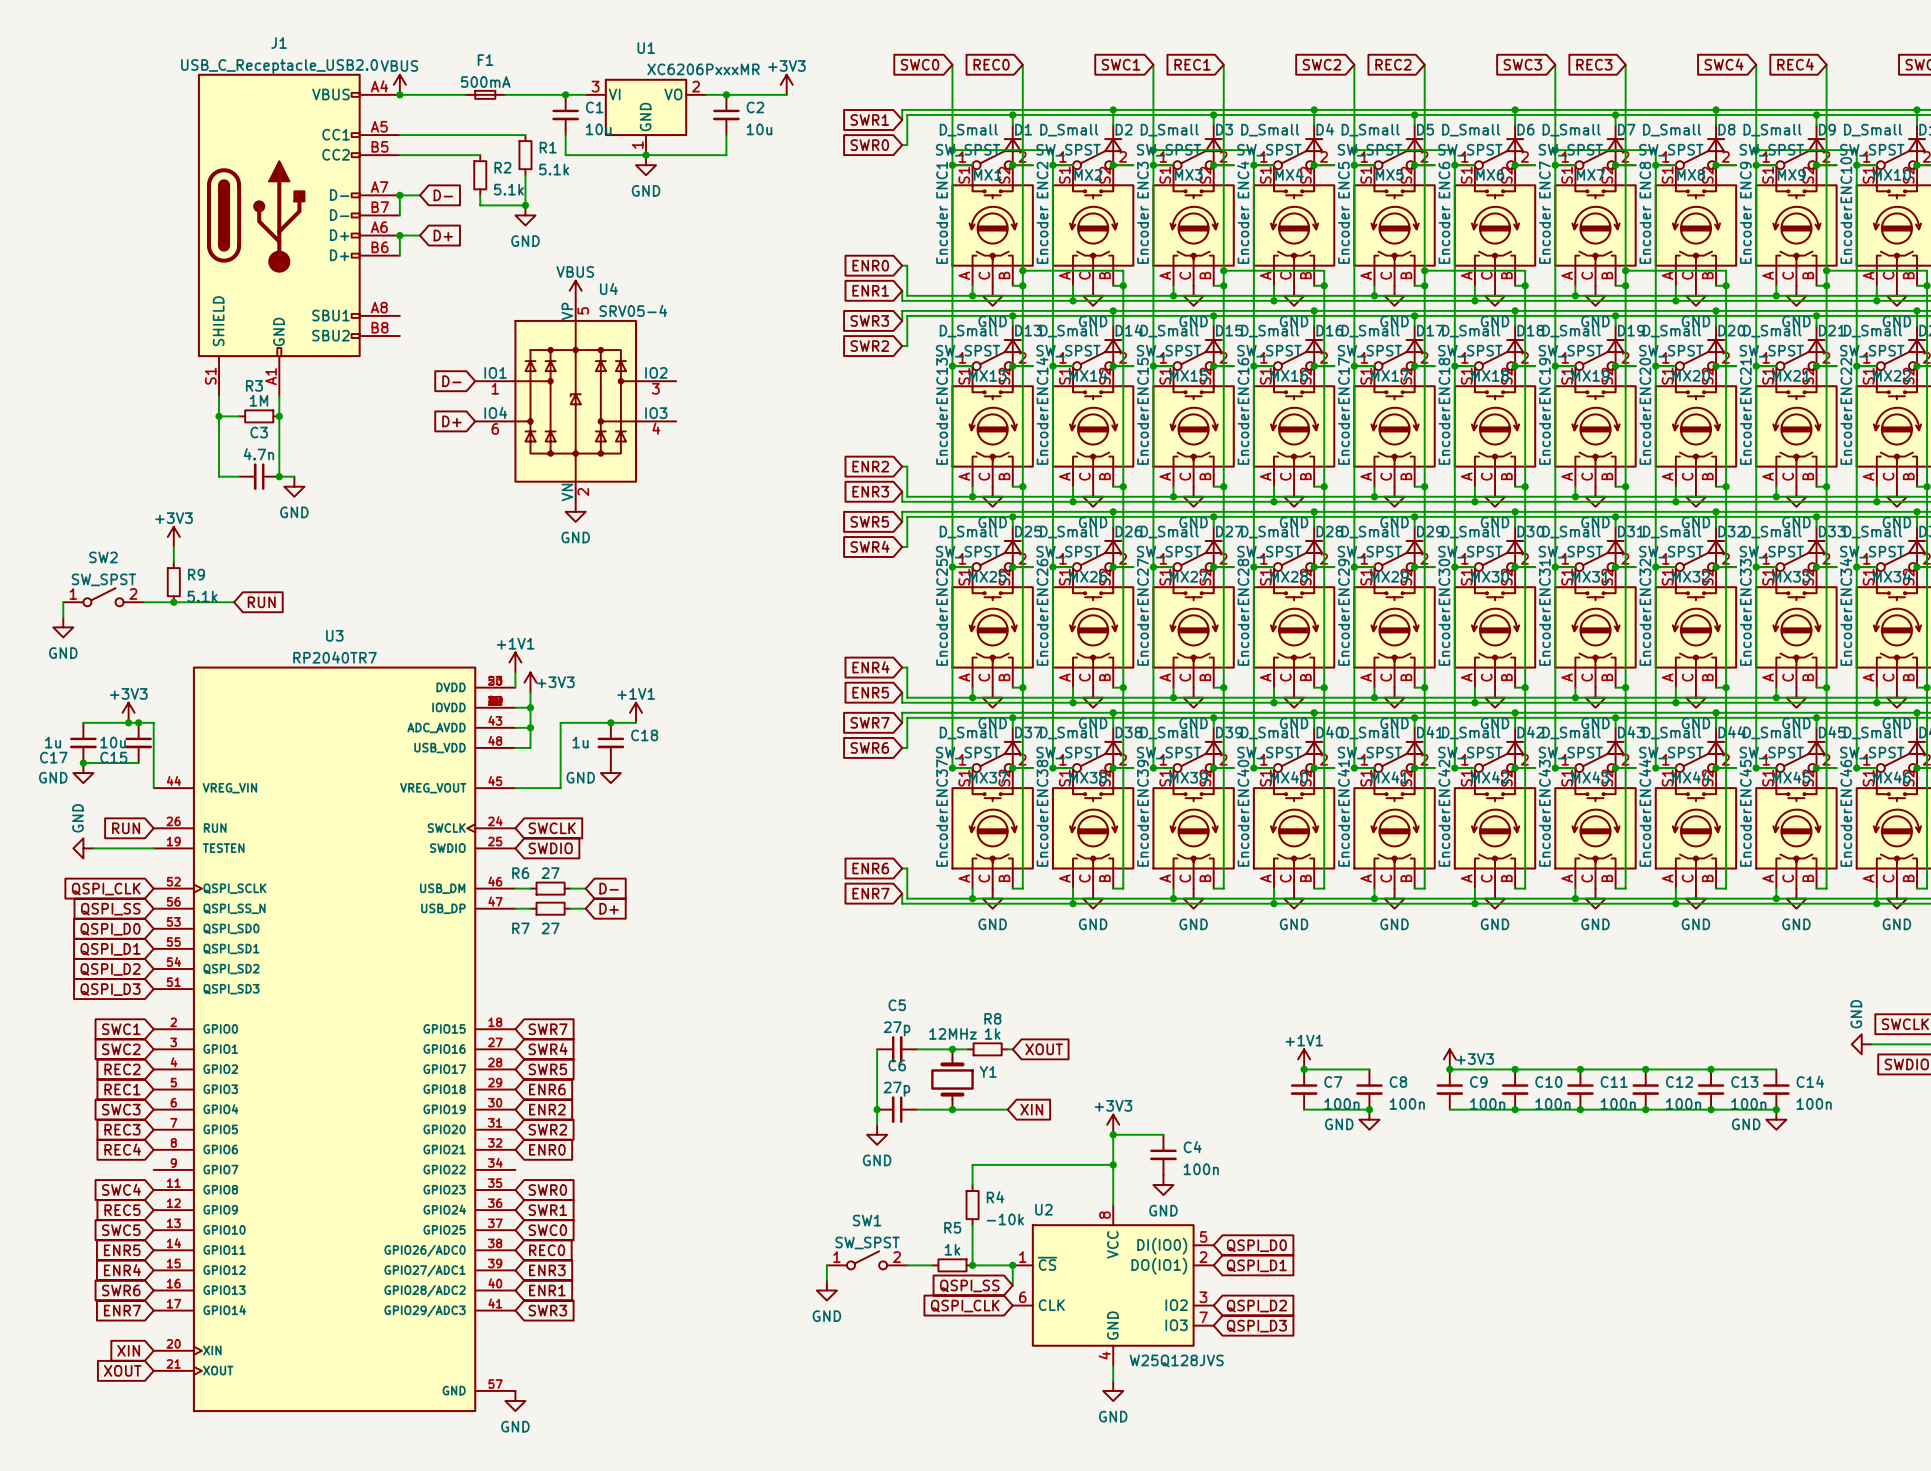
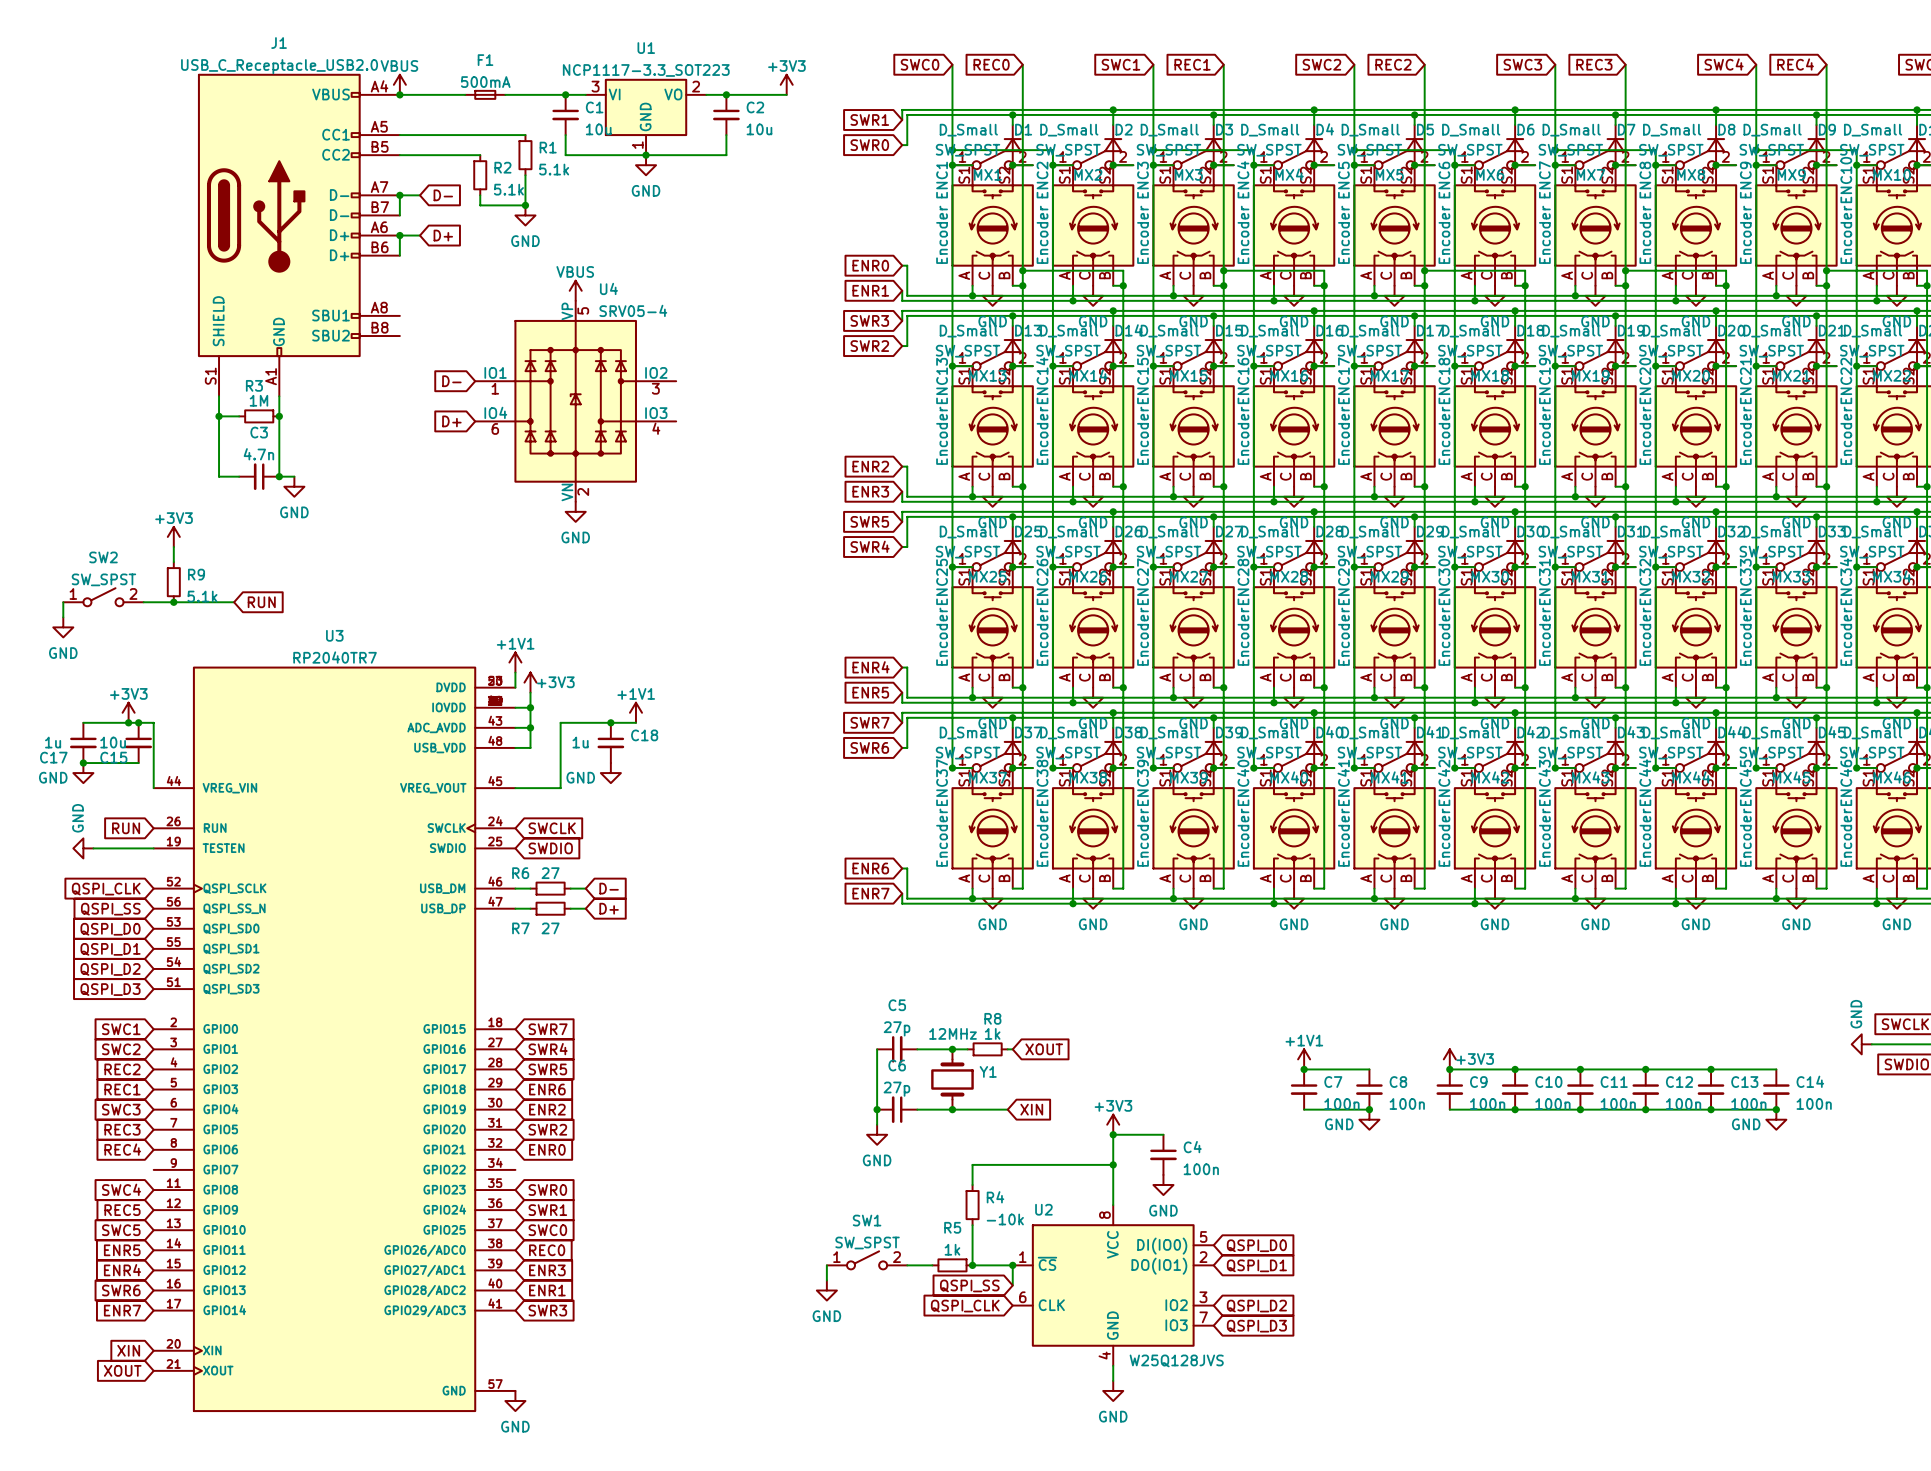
U1 value: XC6206PxxxMR (703, 69) -> NCP1117-3.3_SOT223 (646, 70)

